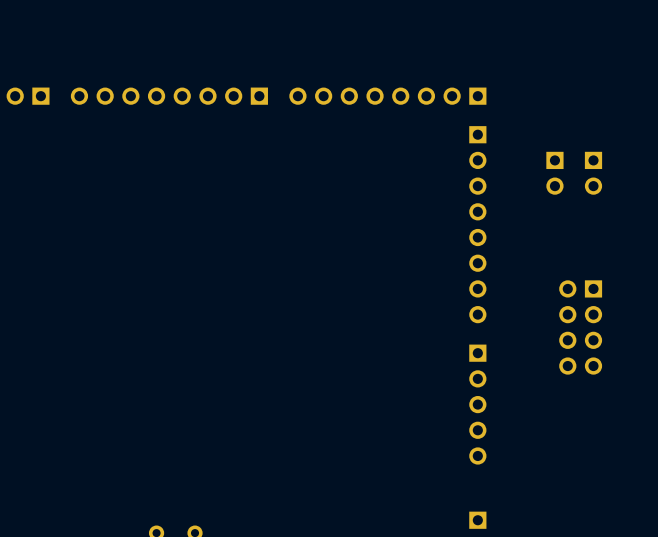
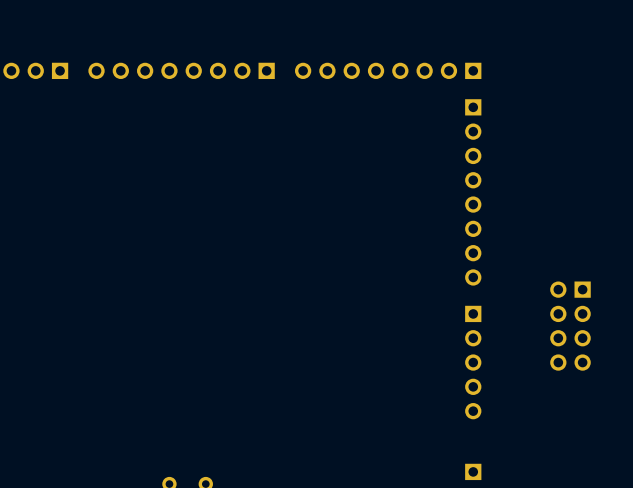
part: (554, 173) -> none
part: (593, 173) -> none
part position: (580, 327) -> (570, 326)

